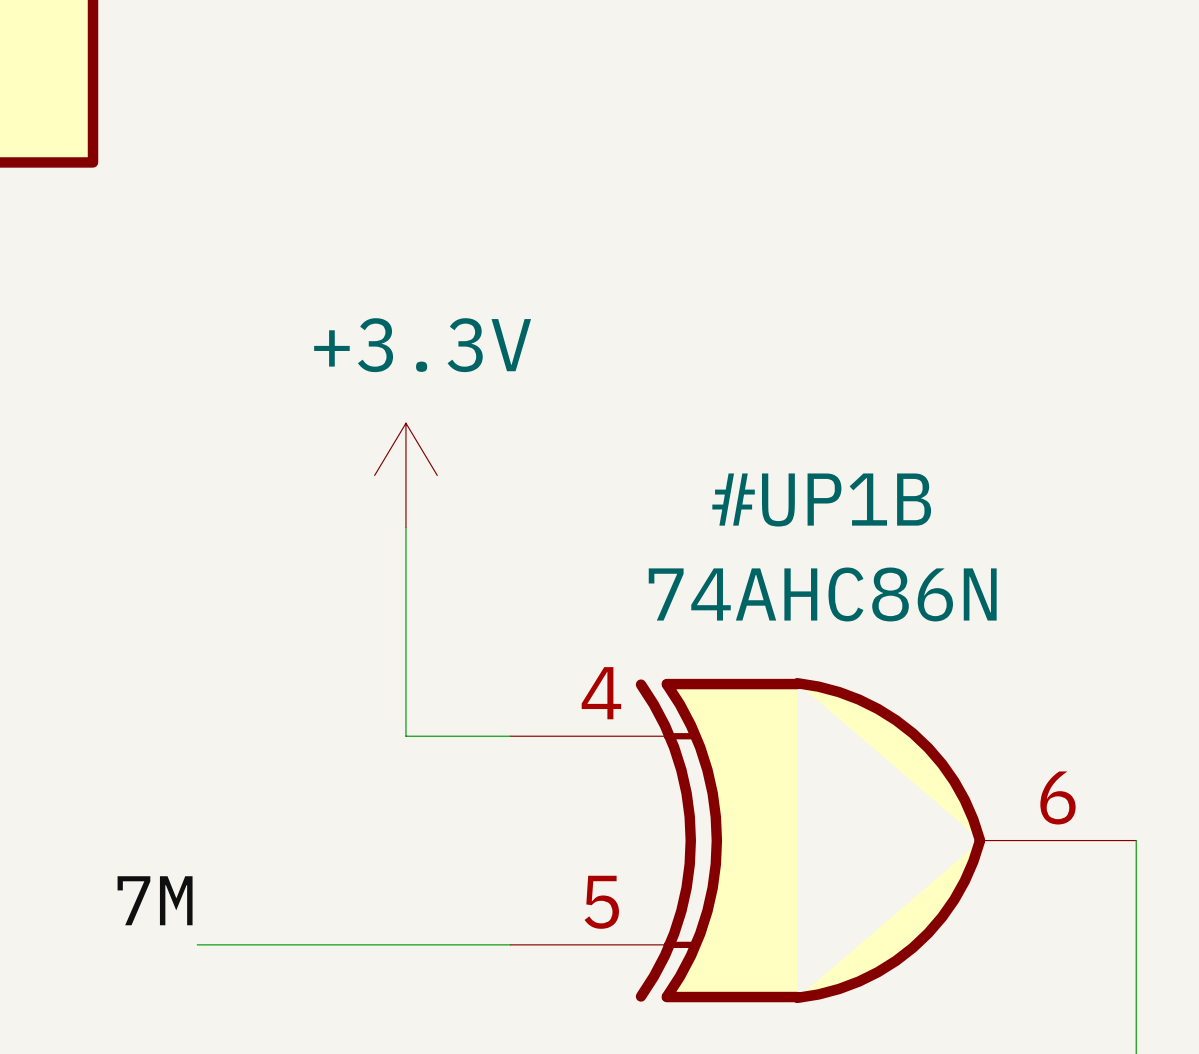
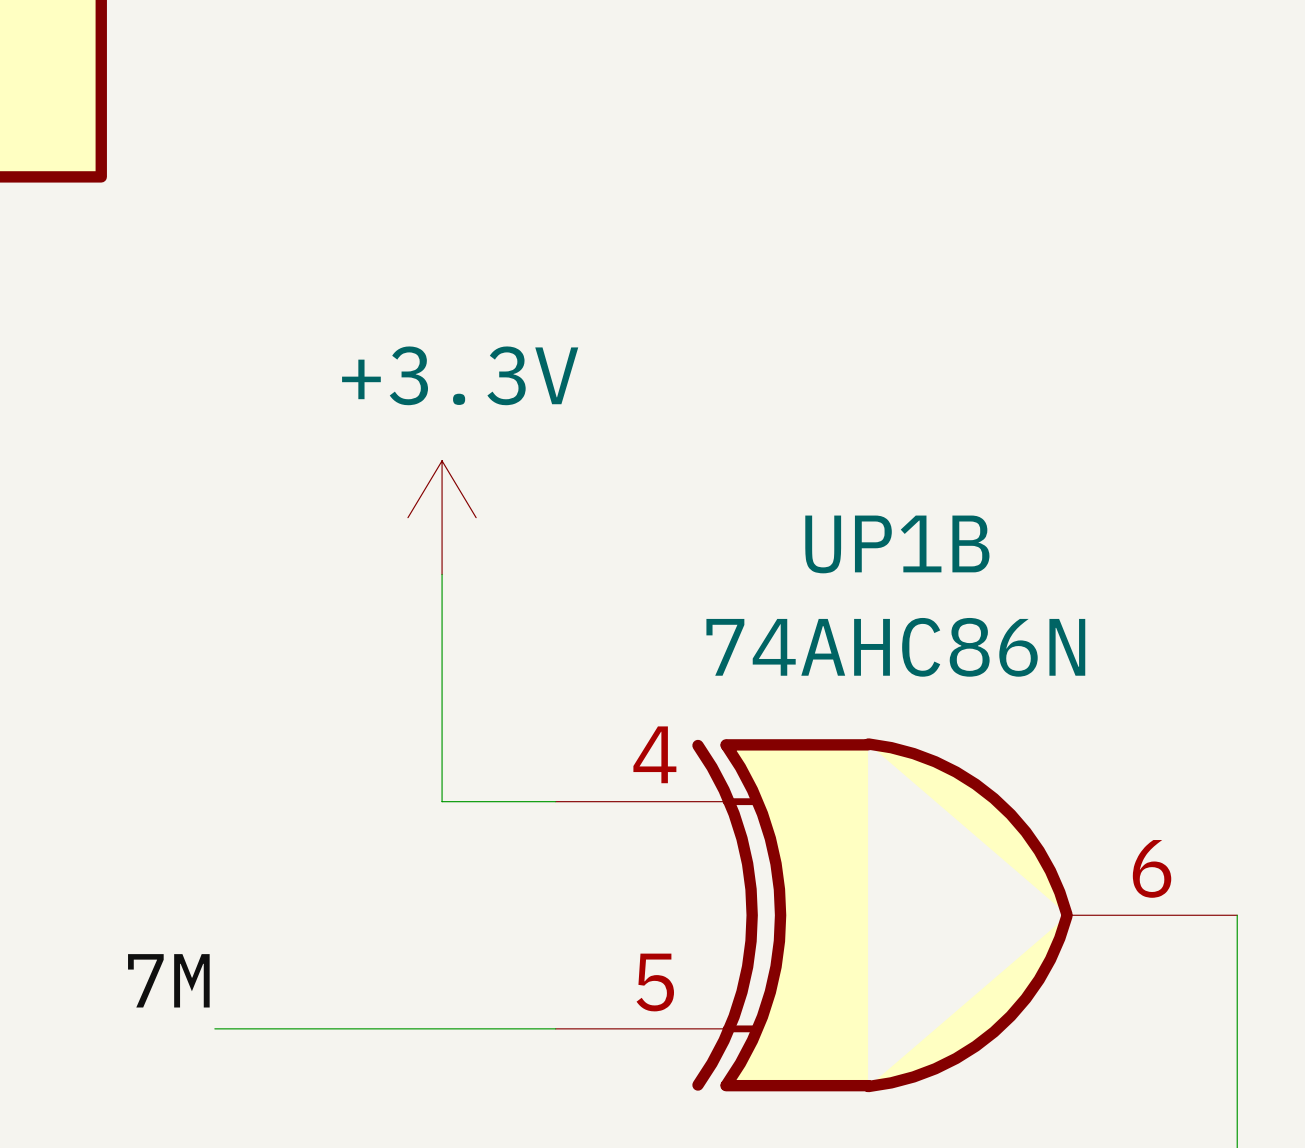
#UP1B: 74AHC86N (823, 840) -> none
UP1B: none -> 74AHC86N (896, 915)

